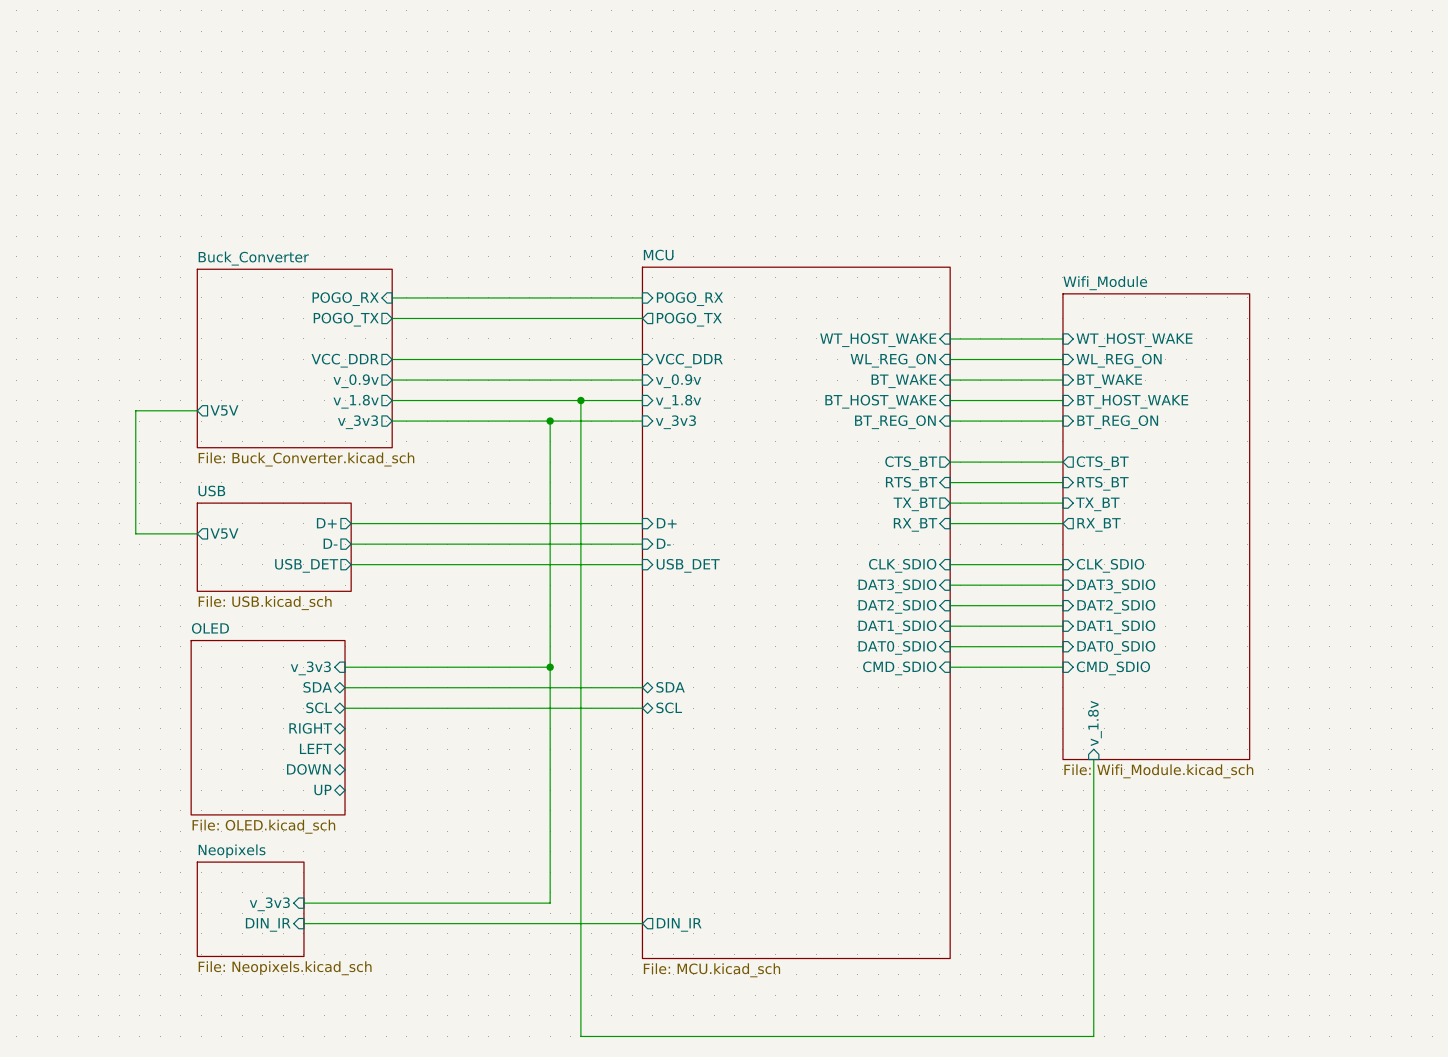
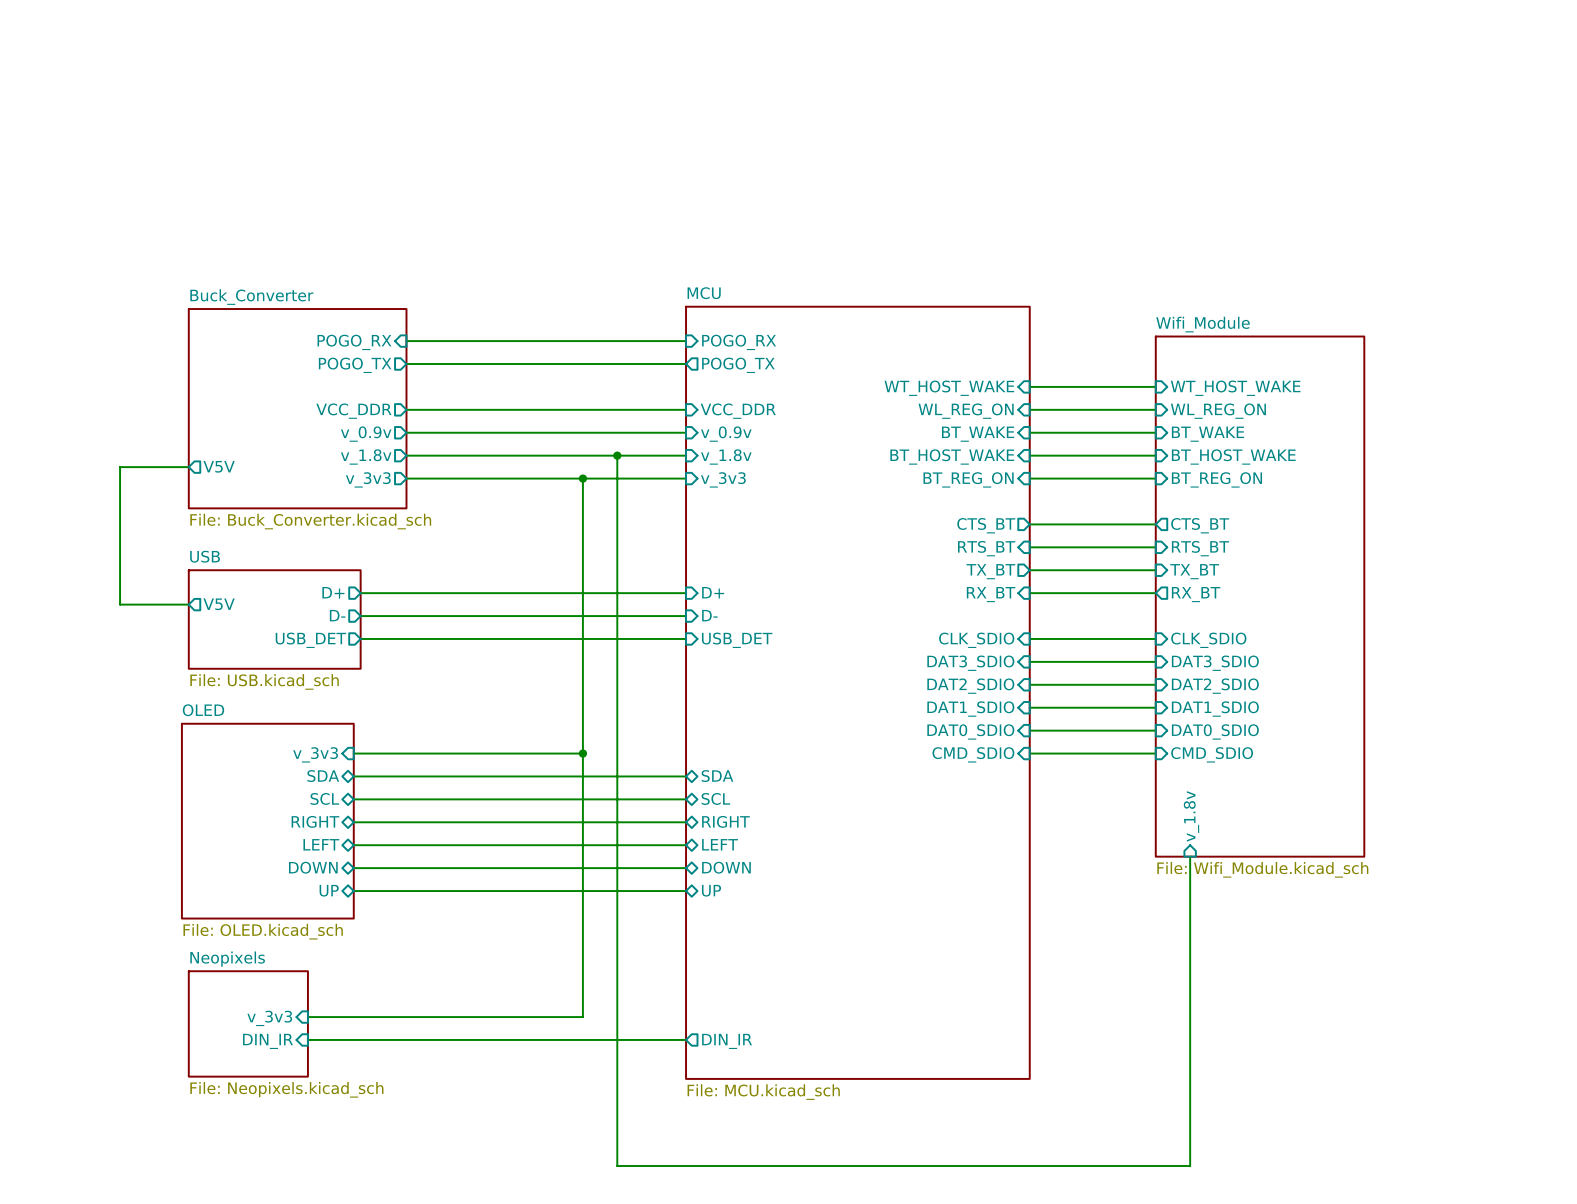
wire: none -> (353, 822) (686, 822)
sheet pin: none -> RIGHT (725, 821)
sheet pin: none -> LEFT (720, 844)
wire: none -> (353, 845) (686, 845)
wire: none -> (353, 868) (686, 868)
sheet pin: none -> DOWN (726, 867)
wire: none -> (353, 891) (686, 891)
sheet pin: none -> UP (711, 890)

